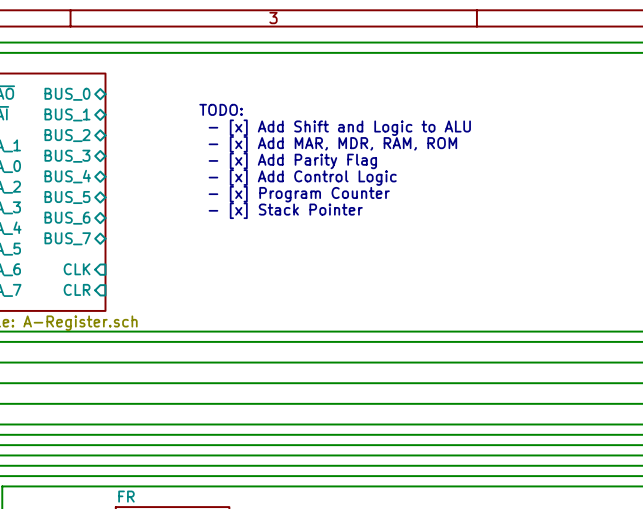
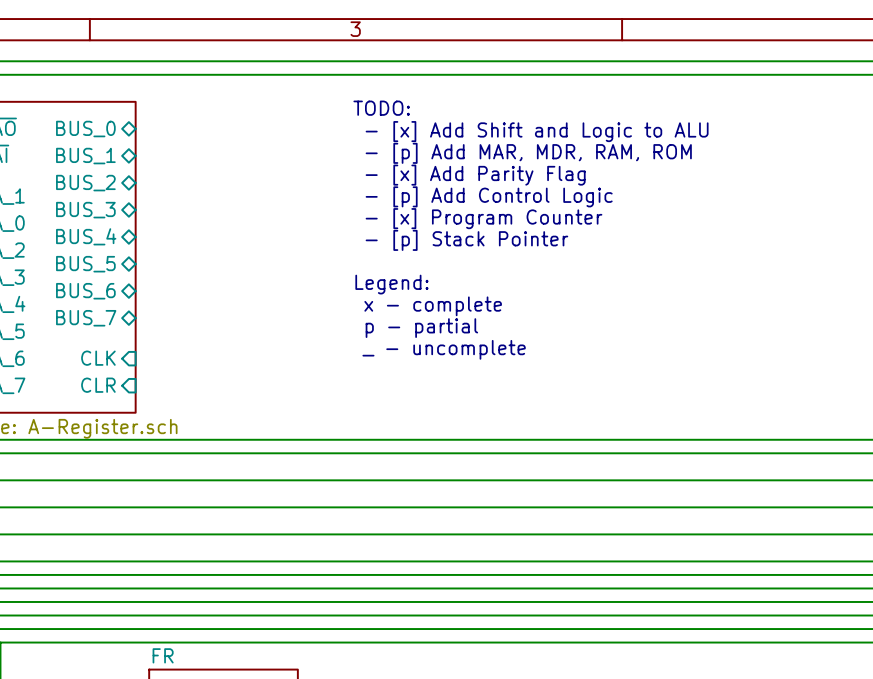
text position: TODO: (221, 109) -> TODO: (381, 108)
text: none -> - [p] Add MAR, MDR, RAM, ROM (528, 153)
text position: - [x] Add Shift and Logic to ALU (339, 127) -> - [x] Add Shift and Logic to ALU (537, 131)
text: - [x] Add MAR, MDR, RAM, ROM (332, 144) -> none
text: none -> - [p] Add Control Logic (489, 196)
text position: - [x] Add Parity Flag (292, 160) -> - [x] Add Parity Flag (475, 175)
text: - [x] Add Control Logic (302, 177) -> none
text: none -> - [p] Stack Pointer (466, 240)
text position: - [x] Program Counter (299, 194) -> - [x] Program Counter (484, 218)
text: - [x] Stack Pointer (285, 210) -> none
text: none -> Legend: (391, 284)
text: none -> x - complete (433, 306)
text: none -> p - partial (421, 328)
text: none -> _ - uncomplete (444, 349)

